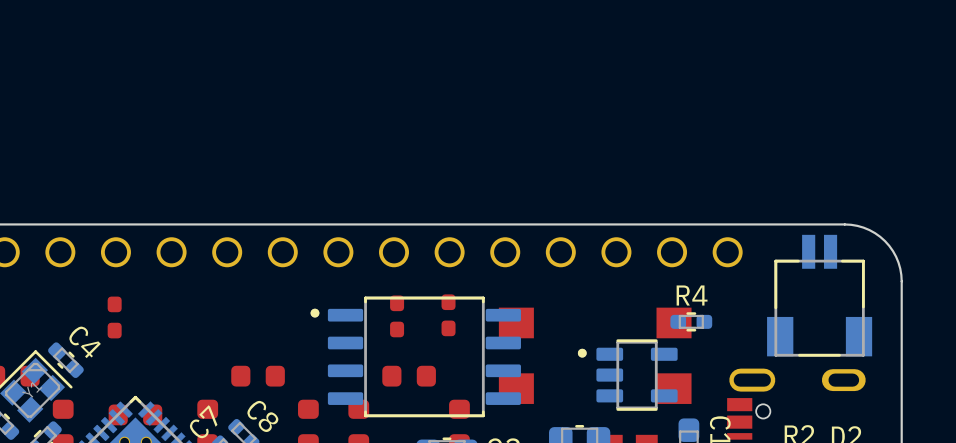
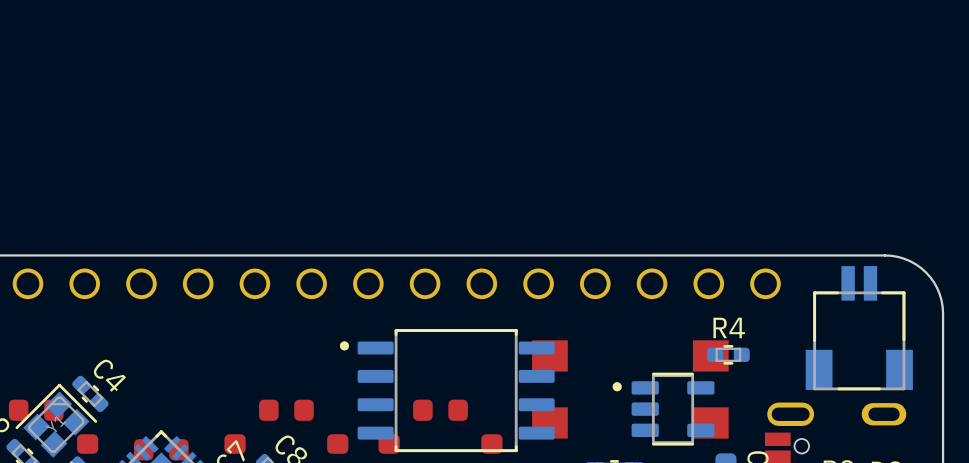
part: (448, 315) -> none
part: (397, 316) -> none
part: (114, 317) -> none

